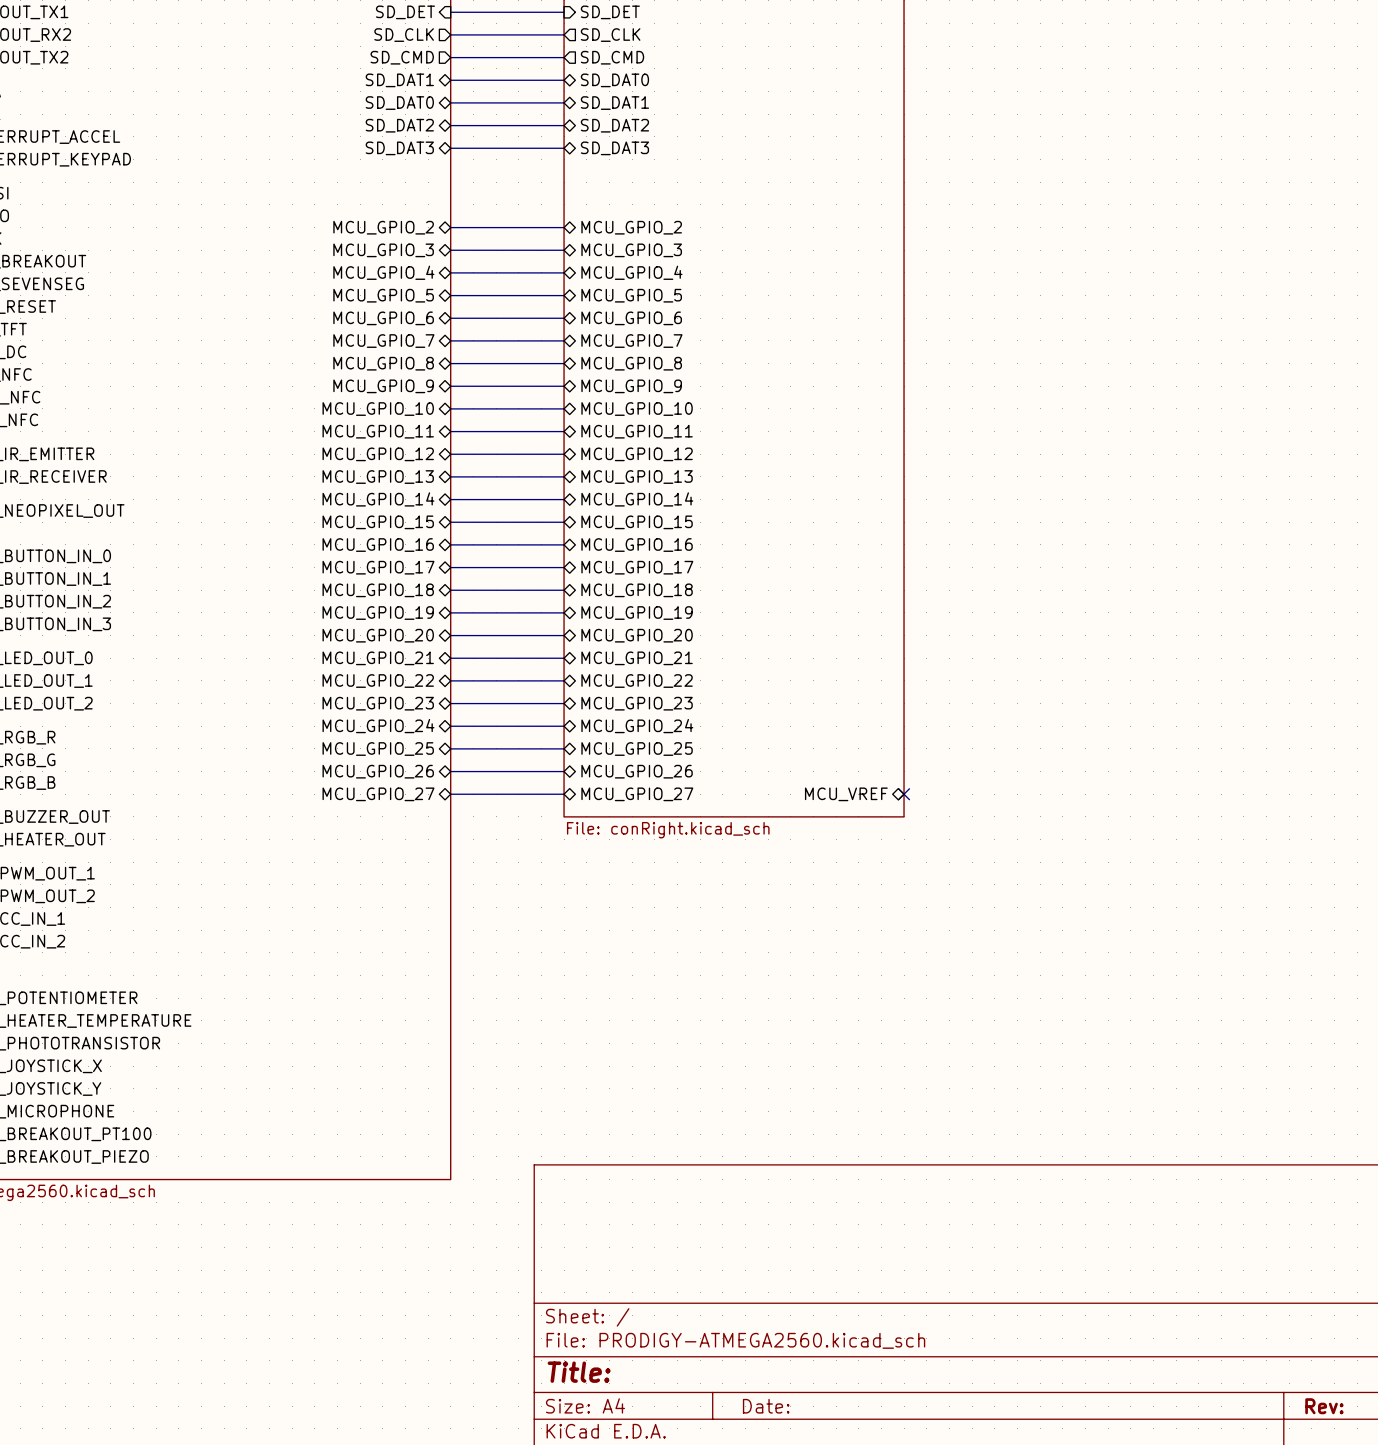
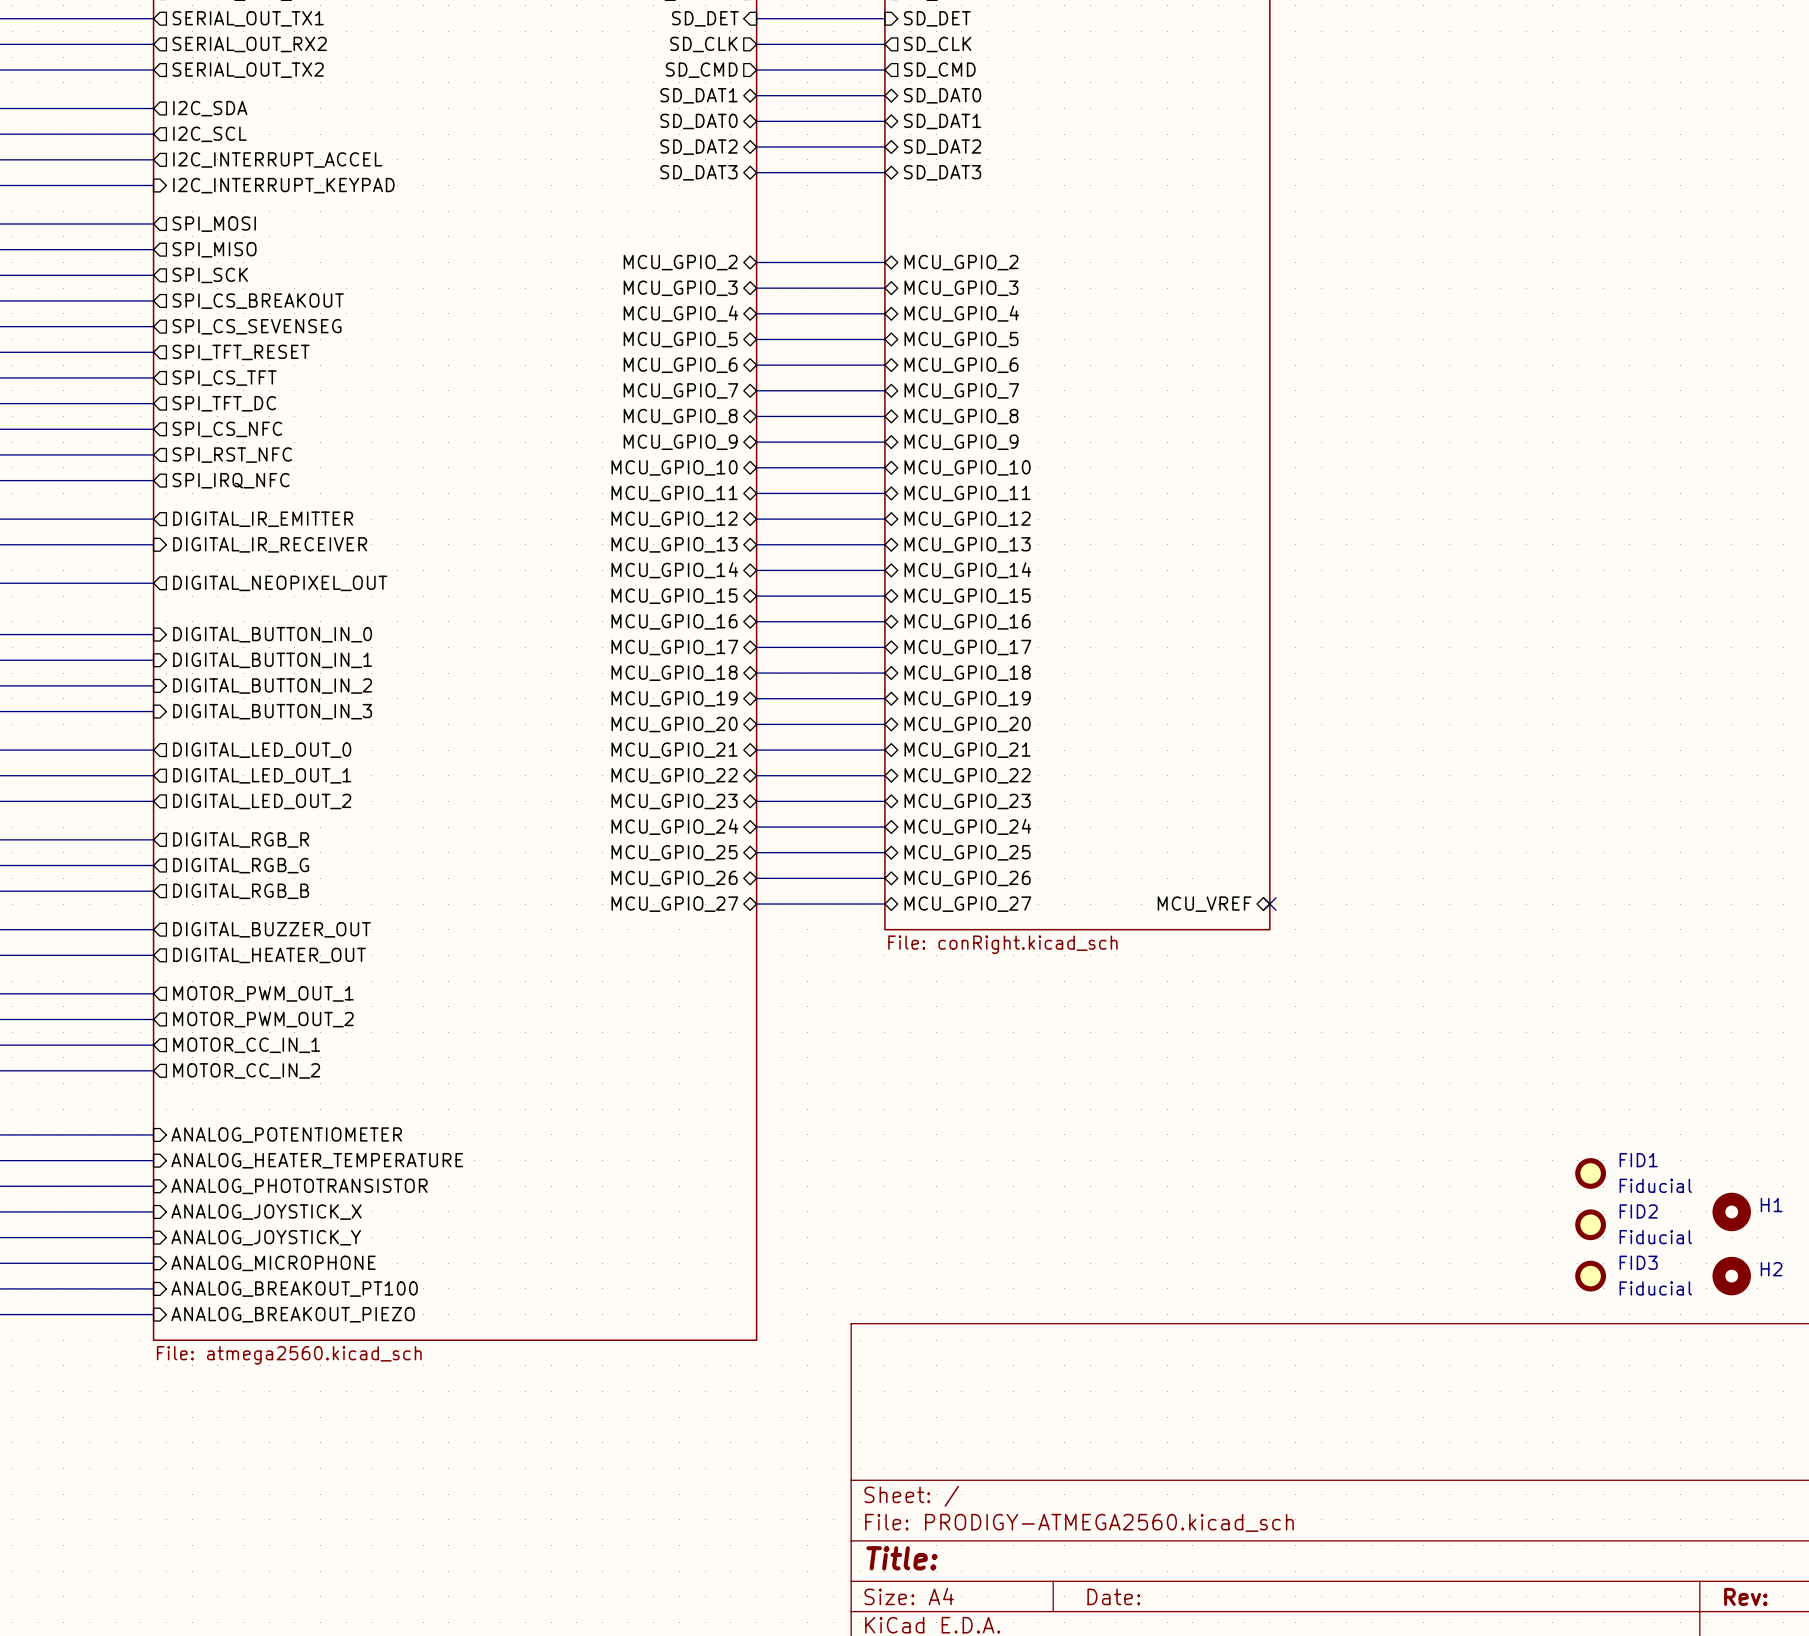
FID1: none -> Fiducial (1590, 1173)
H1: none -> (1731, 1211)
FID2: none -> Fiducial (1590, 1224)
FID3: none -> Fiducial (1590, 1276)
H2: none -> (1731, 1276)

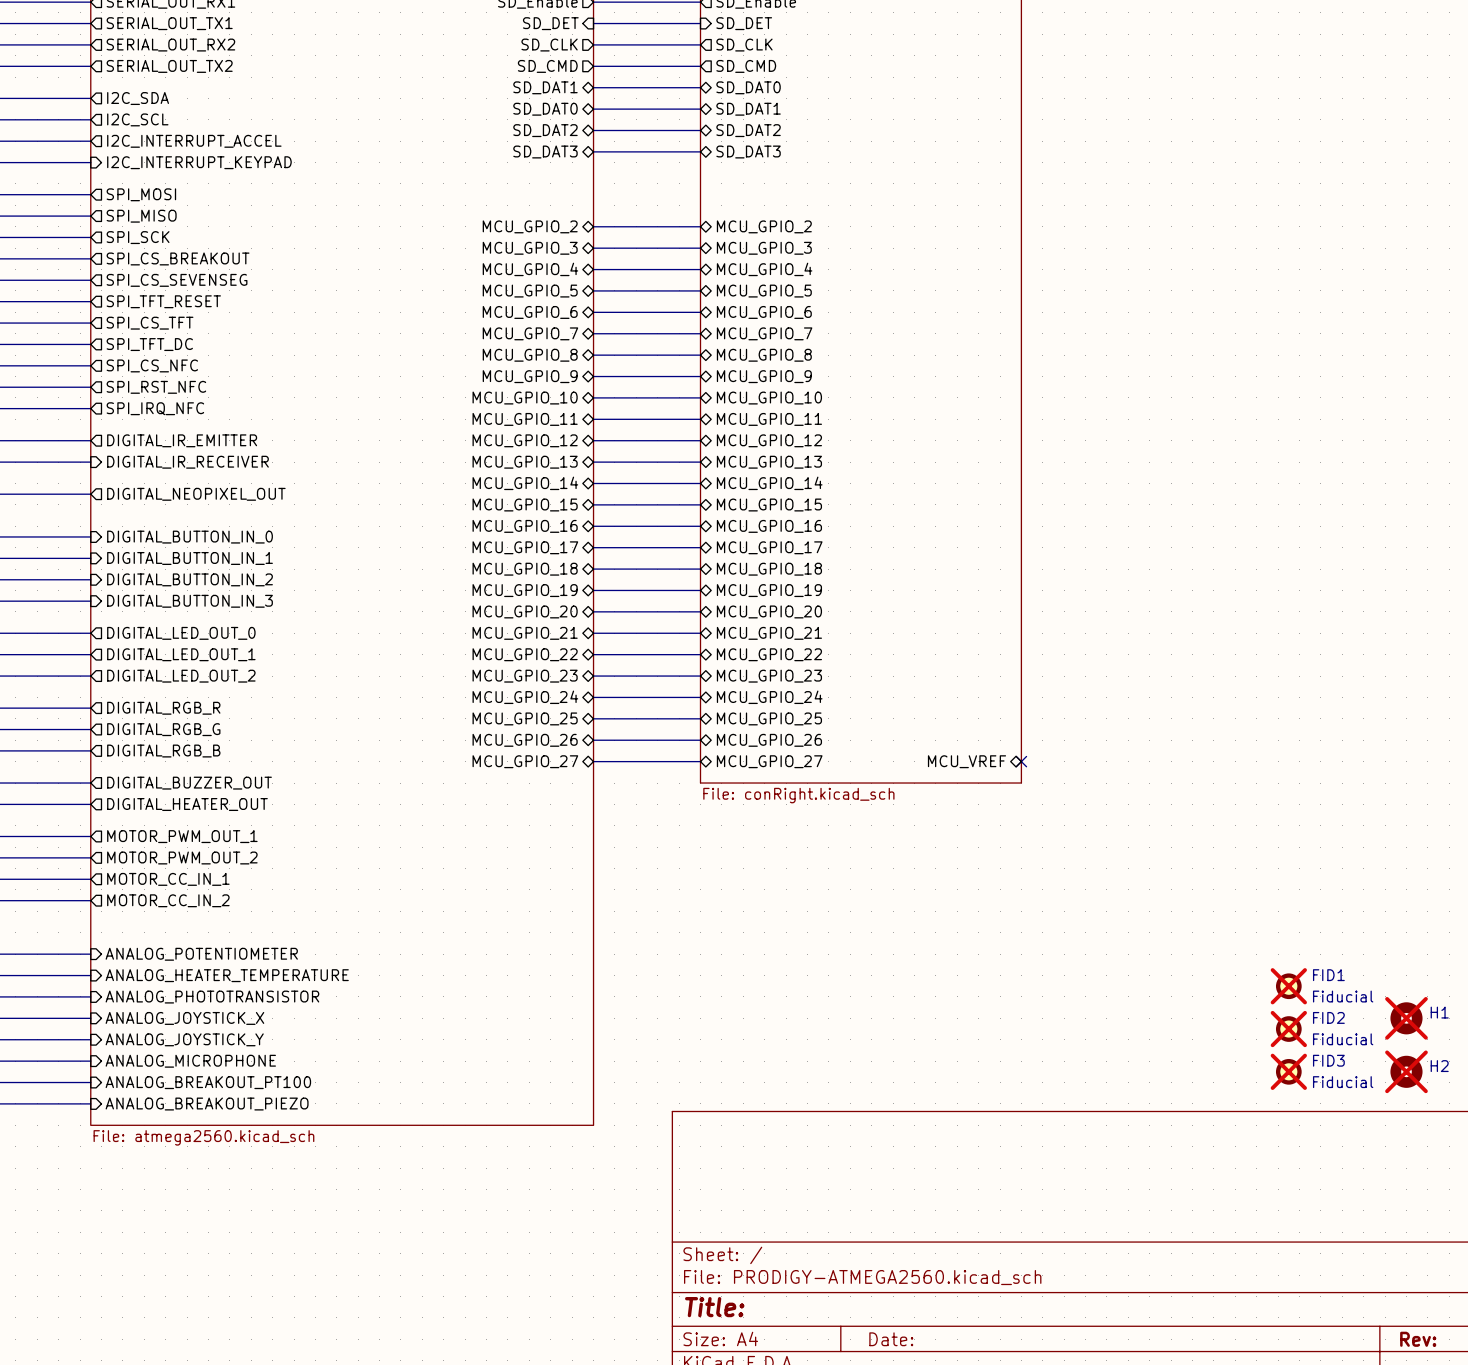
FID1 do-not-place cross: none -> (1288, 986)
H1 do-not-place cross: none -> (1406, 1018)
FID2 do-not-place cross: none -> (1288, 1029)
FID3 do-not-place cross: none -> (1288, 1071)
H2 do-not-place cross: none -> (1406, 1071)

